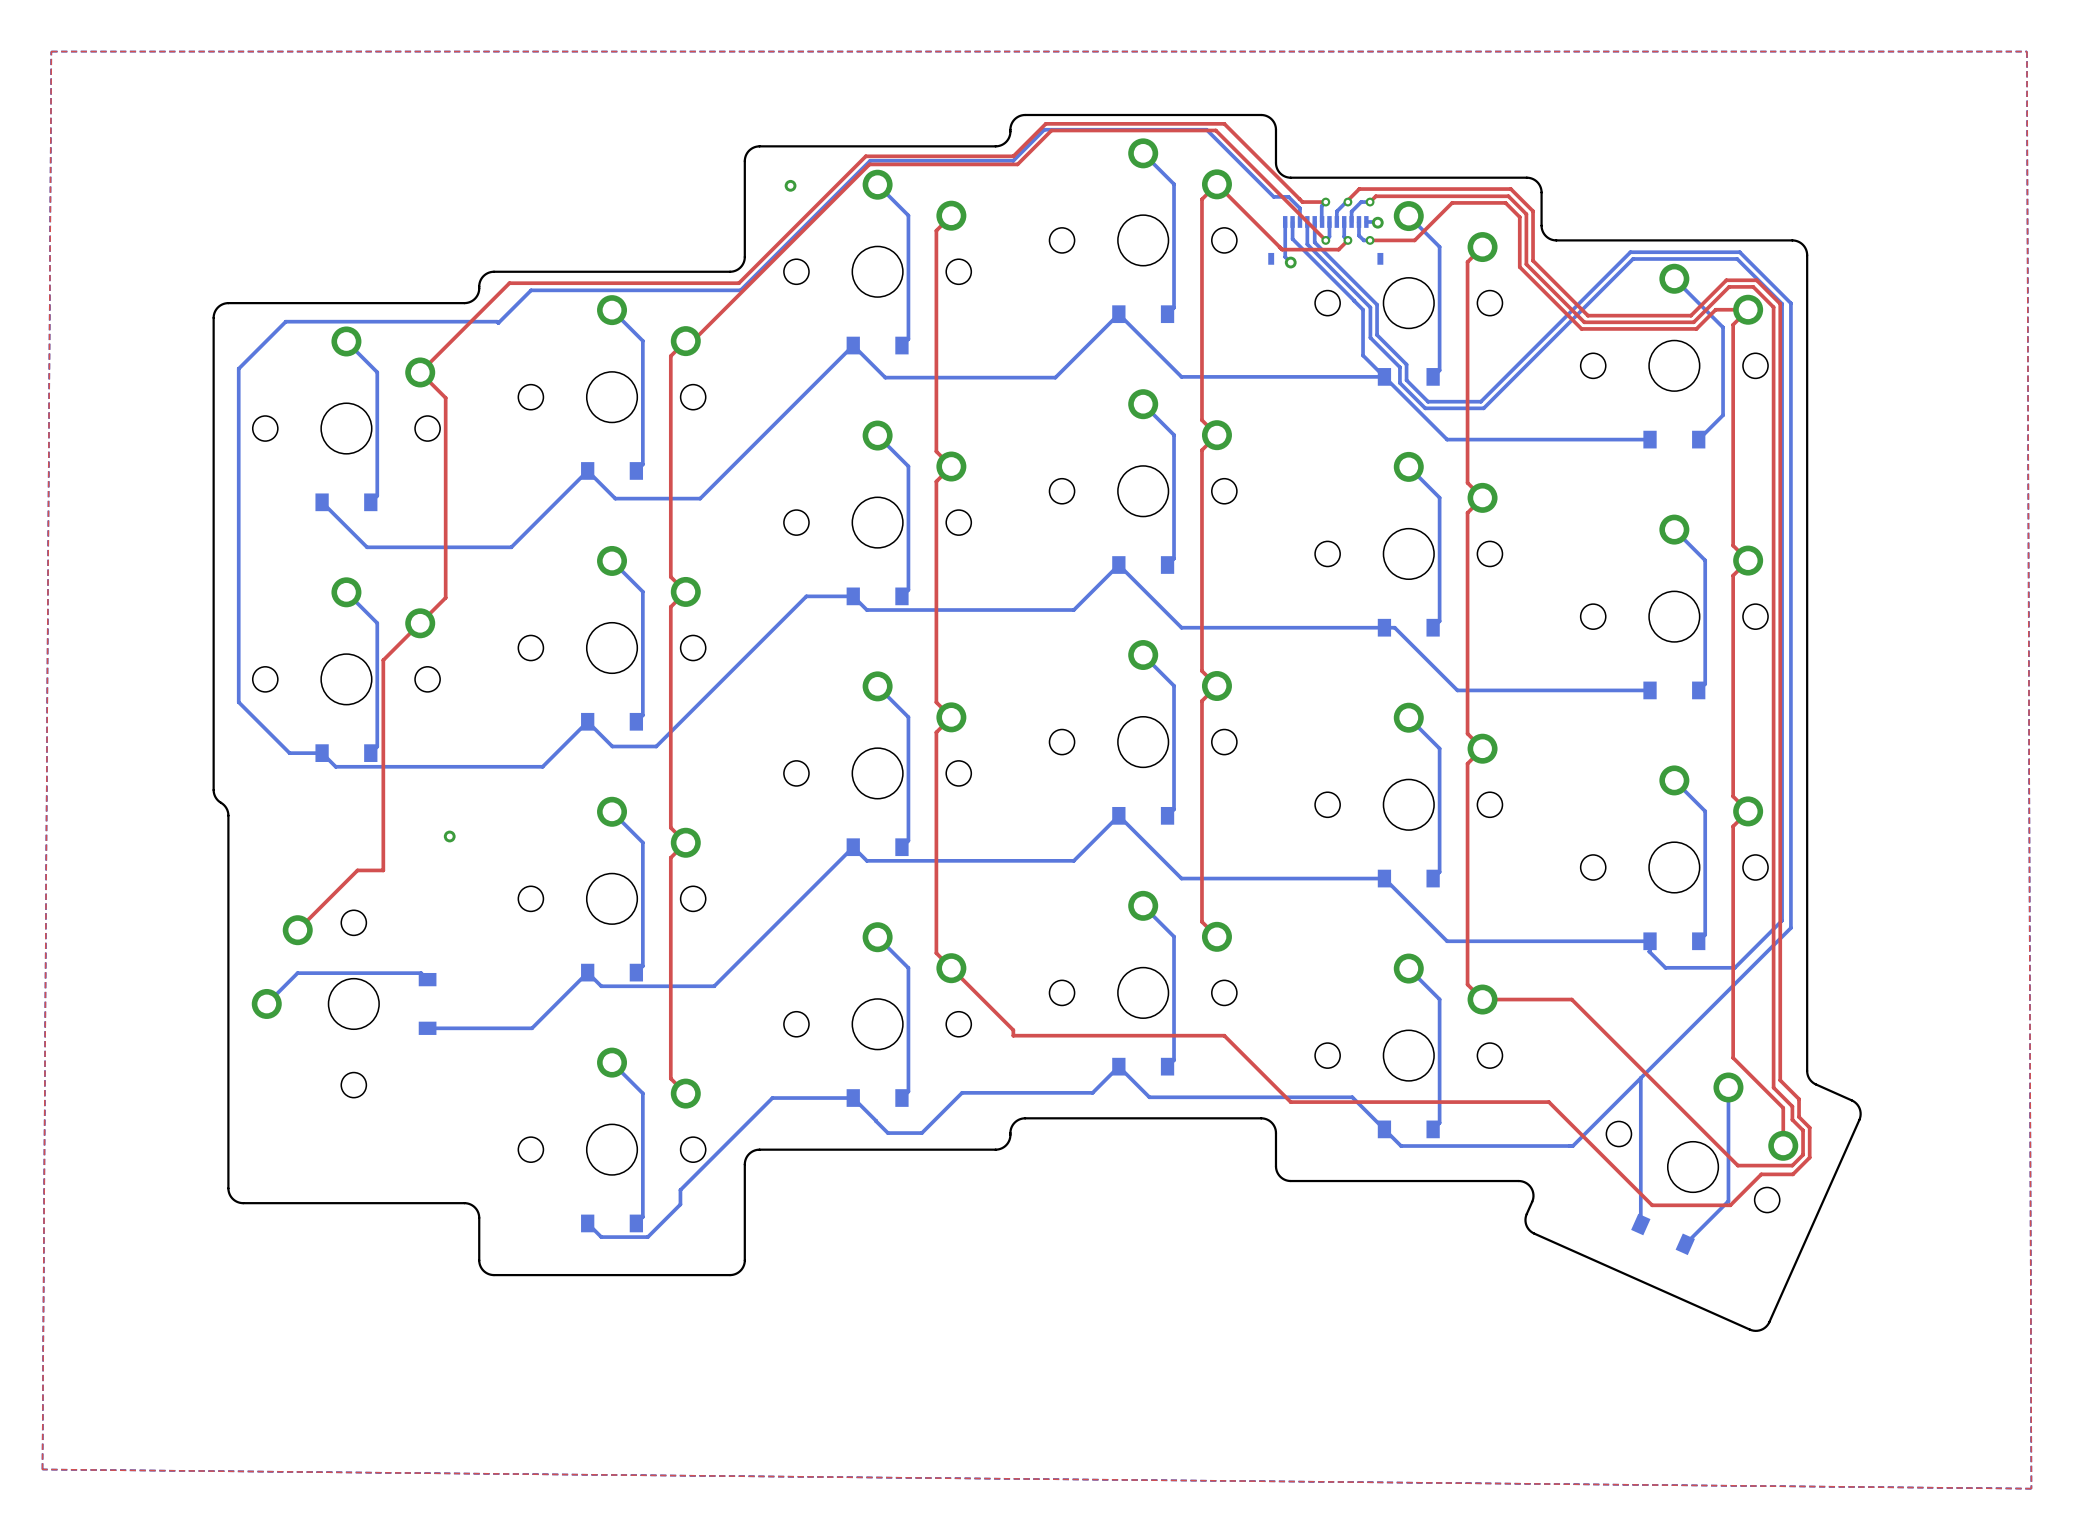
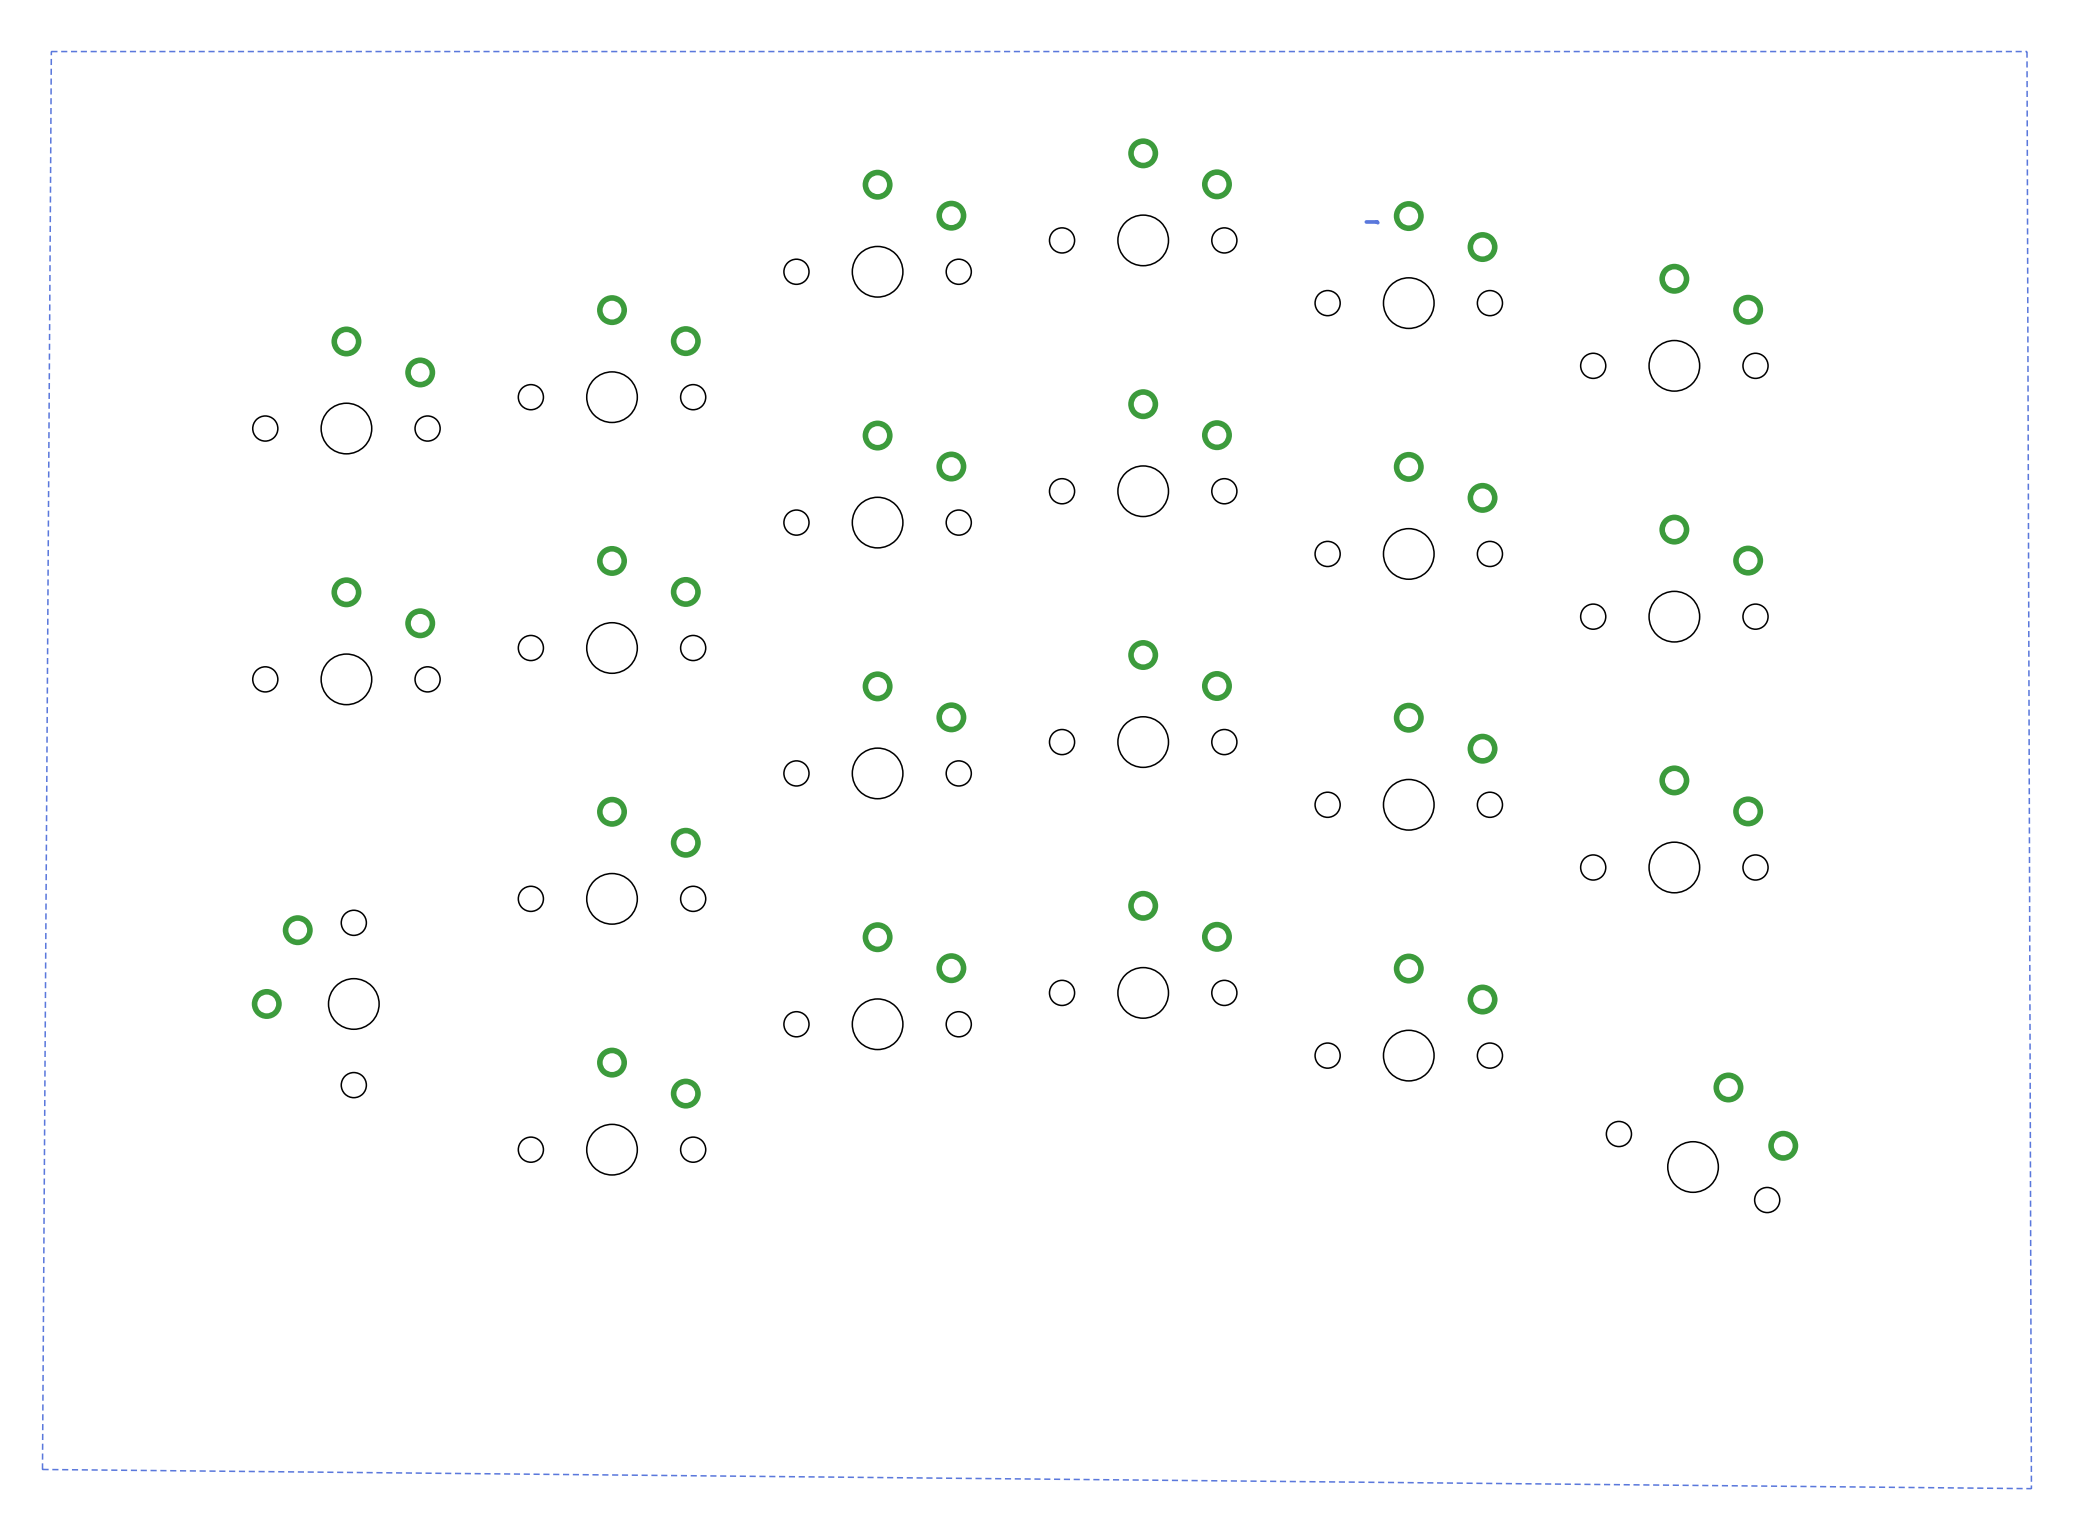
top zone outline: (51, 51) (2027, 51) (2031, 1488) (42, 1469) (51, 51) -> none
board edge: (1025, 114) (1262, 115) (1270, 118) (1275, 124) (1276, 166) (1280, 173) (1287, 177) (1528, 177) (1536, 180) (1540, 187) (1541, 228) (1545, 236) (1553, 240) (1792, 240) (1800, 242) (1804, 247) (1807, 255) (1807, 1072) (1809, 1078) (1814, 1083) (1855, 1102) (1860, 1114) (1769, 1322) (1762, 1329) (1749, 1329) (1532, 1232) (1527, 1227) (1525, 1219) (1532, 1200) (1533, 1192) (1530, 1186) (1522, 1181) (1284, 1179) (1276, 1169) (1275, 1128) (1270, 1121) (1262, 1118) (1023, 1118) (1013, 1123) (1008, 1142) (997, 1149) (754, 1150) (748, 1155) (744, 1162) (744, 1263) (739, 1271) (731, 1274) (492, 1274) (484, 1271) (480, 1265) (478, 1214) (474, 1207) (469, 1203) (243, 1203) (235, 1200) (230, 1196) (228, 1188) (228, 815) (226, 808) (216, 799) (213, 790) (213, 317) (216, 308) (228, 303) (466, 303) (476, 296) (482, 277) (492, 271) (733, 271) (740, 267) (744, 258) (744, 159) (747, 153) (753, 147) (997, 146) (1008, 139) (1013, 120) (1025, 114) -> none
bottom track: (1143, 153) (1174, 184) (1174, 307) (1167, 314) -> none
bottom track: (877, 184) (908, 215) (908, 339) (901, 345) -> none
via: (790, 185) -> none
top track: (1347, 201) (1359, 189) (1510, 189) (1533, 211) (1533, 260) (1587, 315) (1690, 315) (1726, 280) (1756, 280) (1780, 303) (1780, 1080) (1799, 1099) (1799, 1117) (1809, 1127) (1809, 1157) (1792, 1174) (1761, 1174) (1730, 1205) (1652, 1205) (1548, 1102) (1290, 1102) (1224, 1035) (1013, 1035) (1013, 1030) (936, 953) (936, 732) (951, 717) (936, 702) (936, 481) (951, 466) (936, 451) (936, 230) (951, 215) -> none
bottom track: (1347, 201) (1336, 211) (1336, 221) -> none
top track: (1325, 202) (1302, 202) (1224, 123) (1045, 123) (1013, 156) (865, 156) (738, 283) (509, 283) (420, 372) (445, 397) (445, 597) (383, 660) (383, 870) (357, 870) (297, 930) -> none
bottom track: (1325, 202) (1321, 206) (1322, 221) -> none
part: (1325, 202) -> none
part: (1347, 202) -> none
top track: (1370, 202) (1375, 196) (1508, 196) (1526, 214) (1526, 264) (1584, 322) (1693, 322) (1729, 286) (1753, 286) (1773, 307) (1773, 1087) (1792, 1106) (1792, 1119) (1803, 1130) (1803, 1154) (1792, 1165) (1737, 1165) (1571, 999) (1482, 999) (1467, 984) (1467, 763) (1482, 748) (1467, 733) (1467, 512) (1482, 497) (1467, 482) (1467, 262) (1482, 247) -> none
bottom track: (1370, 202) (1361, 202) (1351, 211) (1351, 221) -> none
part: (1370, 202) -> none
bottom track: (1408, 216) (1439, 246) (1439, 370) (1433, 376) -> none
bottom track: (1285, 221) (1285, 257) (1290, 262) -> none
bottom track: (1292, 221) (1292, 239) (1354, 300) -> none
bottom track: (1299, 221) (1299, 208) (1288, 196) (1273, 196) (1206, 129) (1044, 129) (1013, 160) (870, 160) (740, 290) (531, 290) (498, 323) (285, 321) (238, 368) (238, 702) (289, 753) (322, 753) (335, 766) (542, 766) (587, 721) (612, 746) (656, 746) (806, 596) (853, 596) (866, 610) (1073, 610) (1118, 565) (1181, 627) (1394, 627) (1457, 690) (1650, 690) -> none
bottom track: (1307, 221) (1307, 244) (1370, 307) (1370, 337) (1399, 367) (1399, 382) (1425, 408) (1483, 408) (1633, 258) (1737, 258) (1782, 303) (1782, 920) (1734, 967) (1665, 967) (1649, 951) (1650, 941) (1447, 941) (1384, 878) (1181, 878) (1118, 815) (1073, 860) (866, 860) (853, 847) (714, 986) (601, 986) (587, 972) (531, 1028) (427, 1028) -> none
bottom track: (1314, 221) (1314, 242) (1377, 304) (1377, 335) (1406, 364) (1406, 380) (1428, 401) (1480, 401) (1630, 252) (1739, 252) (1790, 303) (1790, 927) (1572, 1146) (1401, 1146) (1352, 1097) (1149, 1097) (1118, 1066) (1092, 1092) (962, 1092) (921, 1133) (887, 1133) (853, 1098) (772, 1098) (680, 1190) (680, 1204) (647, 1237) (601, 1237) (587, 1223) -> none
bottom track: (1329, 221) (1329, 236) (1326, 240) -> none
bottom track: (1344, 221) (1344, 236) (1347, 240) -> none
bottom track: (1358, 222) (1358, 235) (1363, 240) (1370, 240) -> none
via: (1377, 222) -> none
top track: (1325, 240) (1215, 130) (1051, 130) (1017, 164) (869, 164) (692, 341) (685, 341) (670, 356) (670, 576) (685, 591) (670, 606) (670, 827) (685, 842) (670, 857) (670, 1078) (685, 1093) -> none
part: (1325, 240) -> none
part: (1325, 240) -> none
top track: (1347, 240) (1338, 249) (1282, 249) (1216, 184) (1201, 199) (1201, 420) (1216, 435) (1201, 450) (1201, 671) (1216, 686) (1201, 700) (1201, 921) (1216, 936) -> none
part: (1347, 240) -> none
top track: (1370, 240) (1414, 240) (1452, 202) (1505, 202) (1519, 217) (1519, 267) (1581, 328) (1696, 328) (1715, 309) (1748, 309) (1733, 324) (1733, 545) (1748, 560) (1733, 575) (1733, 796) (1748, 811) (1733, 826) (1733, 1057) (1783, 1107) (1783, 1145) -> none
part: (1370, 240) -> none
via: (1290, 262) -> none
bottom track: (1674, 278) (1723, 327) (1723, 415) (1698, 439) -> none
bottom track: (1354, 301) (1363, 309) (1363, 355) (1447, 439) (1650, 439) -> none
bottom track: (612, 310) (642, 340) (642, 464) (636, 470) -> none
part: (1143, 314) -> none
bottom track: (346, 341) (377, 372) (377, 495) (370, 502) -> none
part: (877, 345) -> none
bottom track: (1384, 376) (1181, 376) (1118, 314) (1055, 377) (885, 377) (853, 345) (700, 498) (615, 498) (587, 470) (511, 547) (367, 547) (322, 502) -> none
part: (1408, 376) -> none
bottom track: (1143, 404) (1174, 435) (1174, 558) (1167, 565) -> none
bottom track: (877, 435) (908, 466) (908, 589) (901, 596) -> none
part: (1674, 439) -> none
bottom track: (1408, 466) (1439, 497) (1439, 621) (1433, 627) -> none
part: (612, 470) -> none
part: (346, 502) -> none
bottom track: (1674, 529) (1705, 560) (1705, 683) (1698, 690) -> none
bottom track: (612, 560) (642, 591) (642, 715) (636, 721) -> none
part: (1143, 565) -> none
bottom track: (346, 592) (377, 623) (377, 746) (370, 753) -> none
part: (877, 596) -> none
part: (1408, 627) -> none
bottom track: (1143, 655) (1174, 685) (1174, 809) (1167, 815) -> none
bottom track: (877, 686) (908, 717) (908, 840) (901, 847) -> none
part: (1674, 690) -> none
bottom track: (1408, 717) (1439, 748) (1439, 872) (1433, 878) -> none
part: (612, 721) -> none
part: (346, 753) -> none
bottom track: (1674, 780) (1705, 811) (1705, 934) (1698, 941) -> none
bottom track: (612, 811) (642, 842) (642, 966) (636, 972) -> none
part: (1143, 815) -> none
via: (449, 836) -> none
part: (877, 847) -> none
part: (1408, 878) -> none
bottom track: (1143, 905) (1174, 936) (1174, 1060) (1167, 1066) -> none
bottom track: (877, 937) (908, 968) (908, 1091) (901, 1098) -> none
part: (1674, 941) -> none
bottom track: (1408, 968) (1439, 999) (1439, 1122) (1433, 1129) -> none
part: (612, 972) -> none
bottom track: (427, 979) (421, 973) (297, 973) (266, 1003) -> none
part: (427, 1003) -> none
bottom track: (612, 1062) (642, 1093) (642, 1216) (636, 1223) -> none
part: (1143, 1066) -> none
bottom track: (1640, 1078) (1640, 1224) -> none
bottom track: (1728, 1087) (1728, 1201) (1685, 1244) -> none
part: (877, 1098) -> none
part: (1408, 1129) -> none
part: (612, 1223) -> none
part: (1663, 1234) -> none

